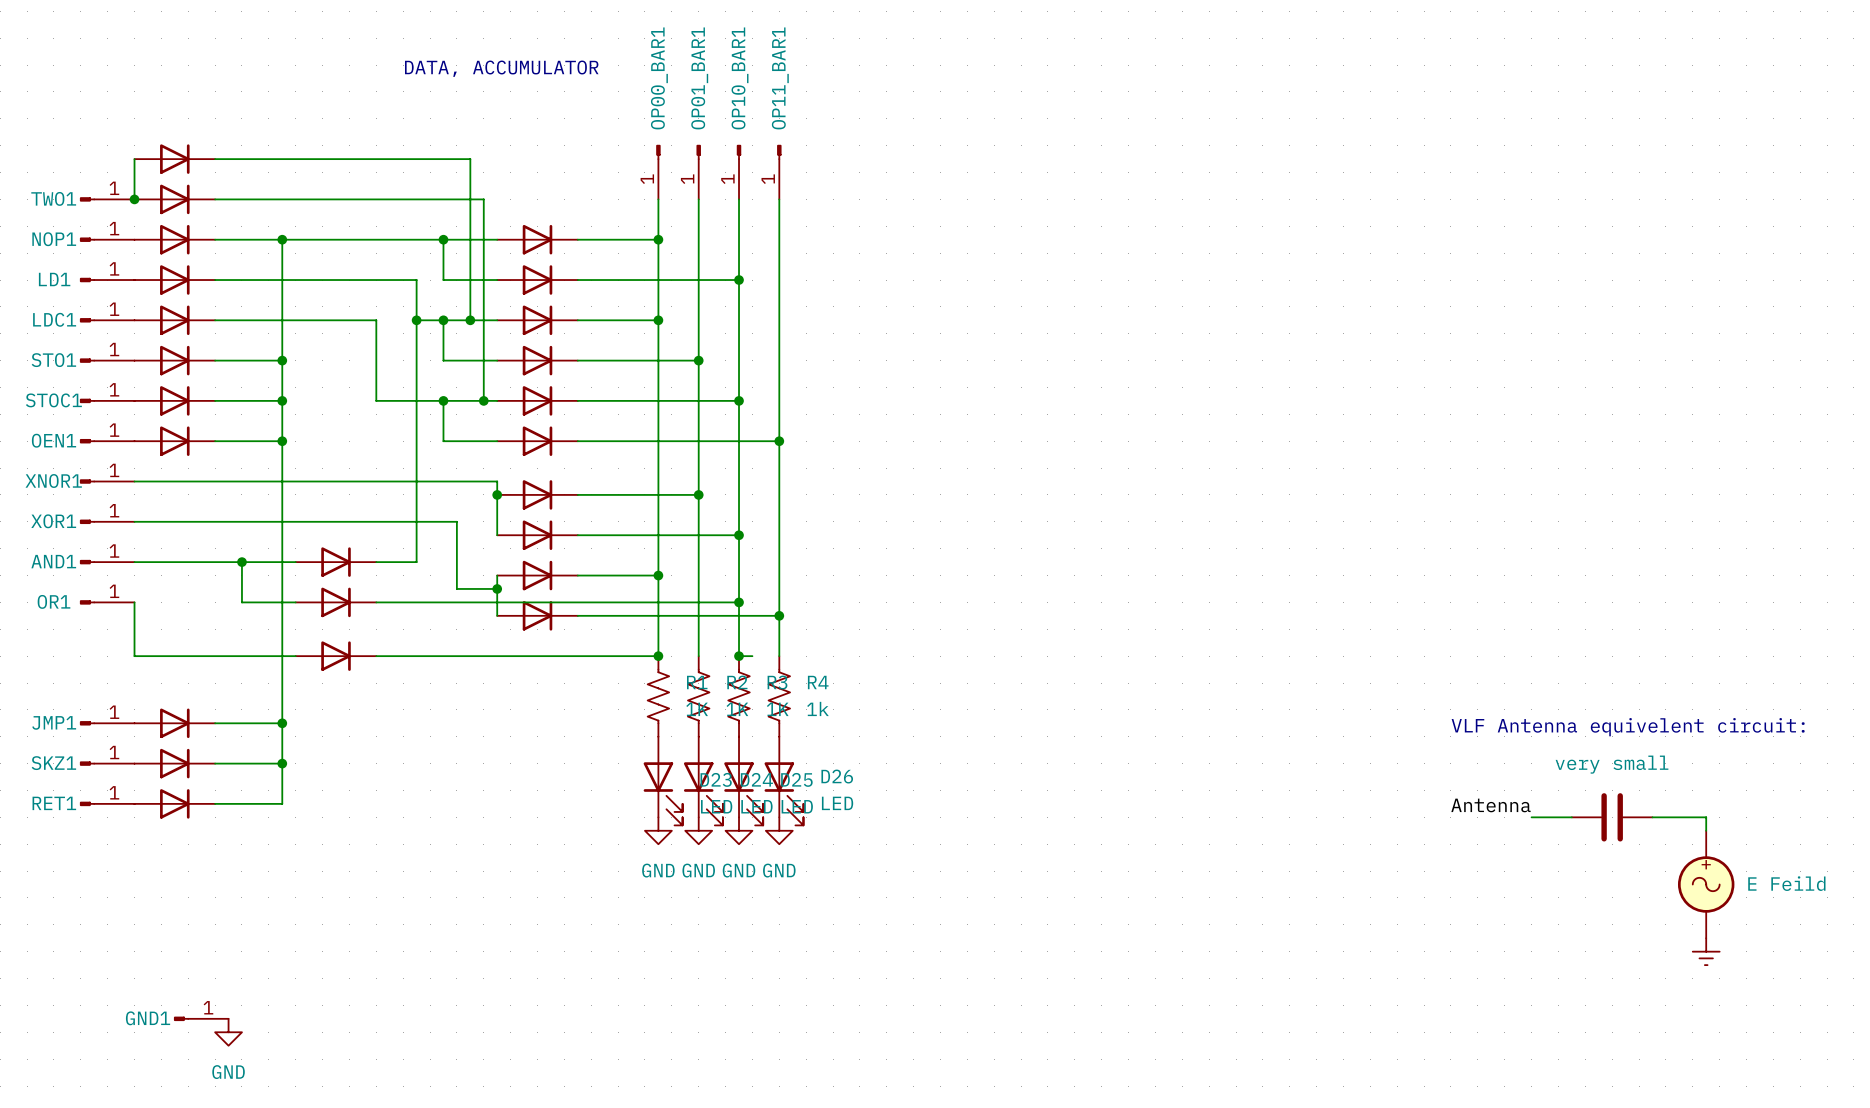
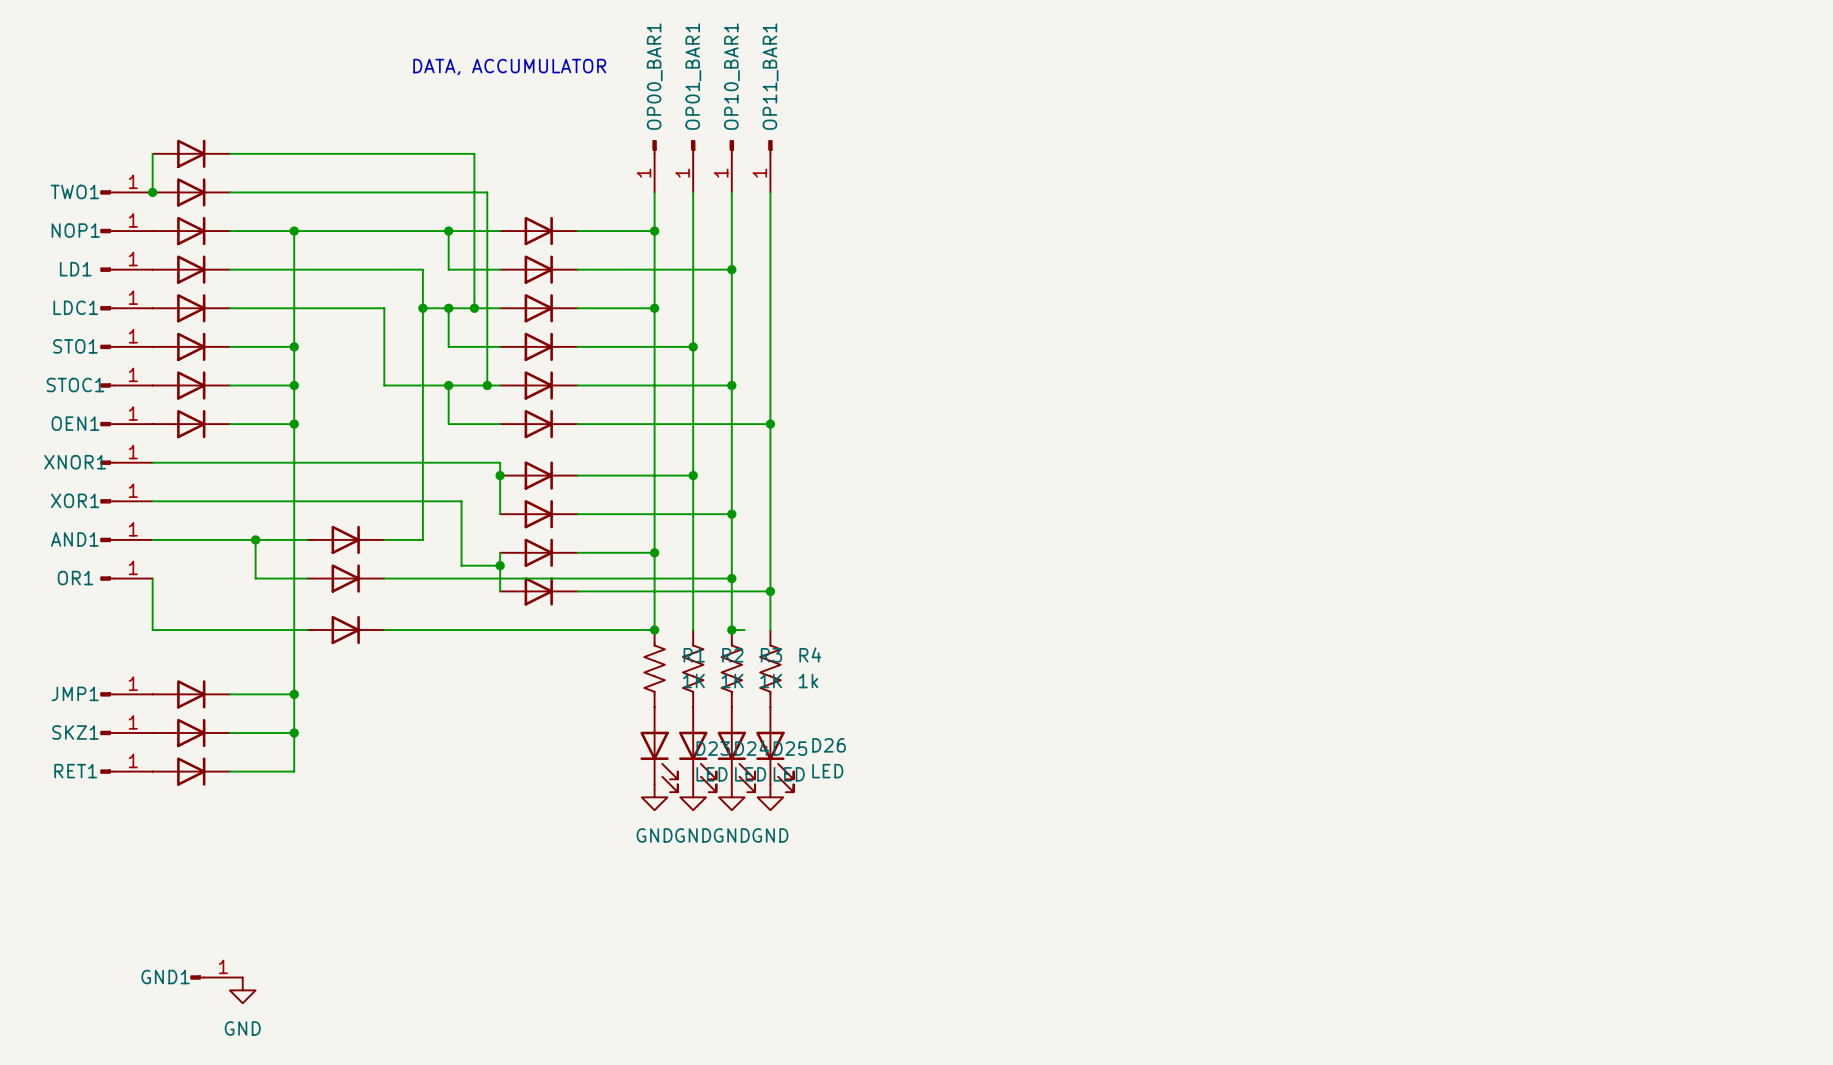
text: VLF Antenna equivelent circuit: (1628, 727) -> none
label: Antenna (1490, 805) -> none
wire: (1531, 817) (1571, 817) -> none
part: very small (1612, 817) -> none
wire: (1652, 817) (1706, 817) (1706, 830) -> none
part: E Feild (1706, 884) -> none
power symbol: (1706, 951) -> none

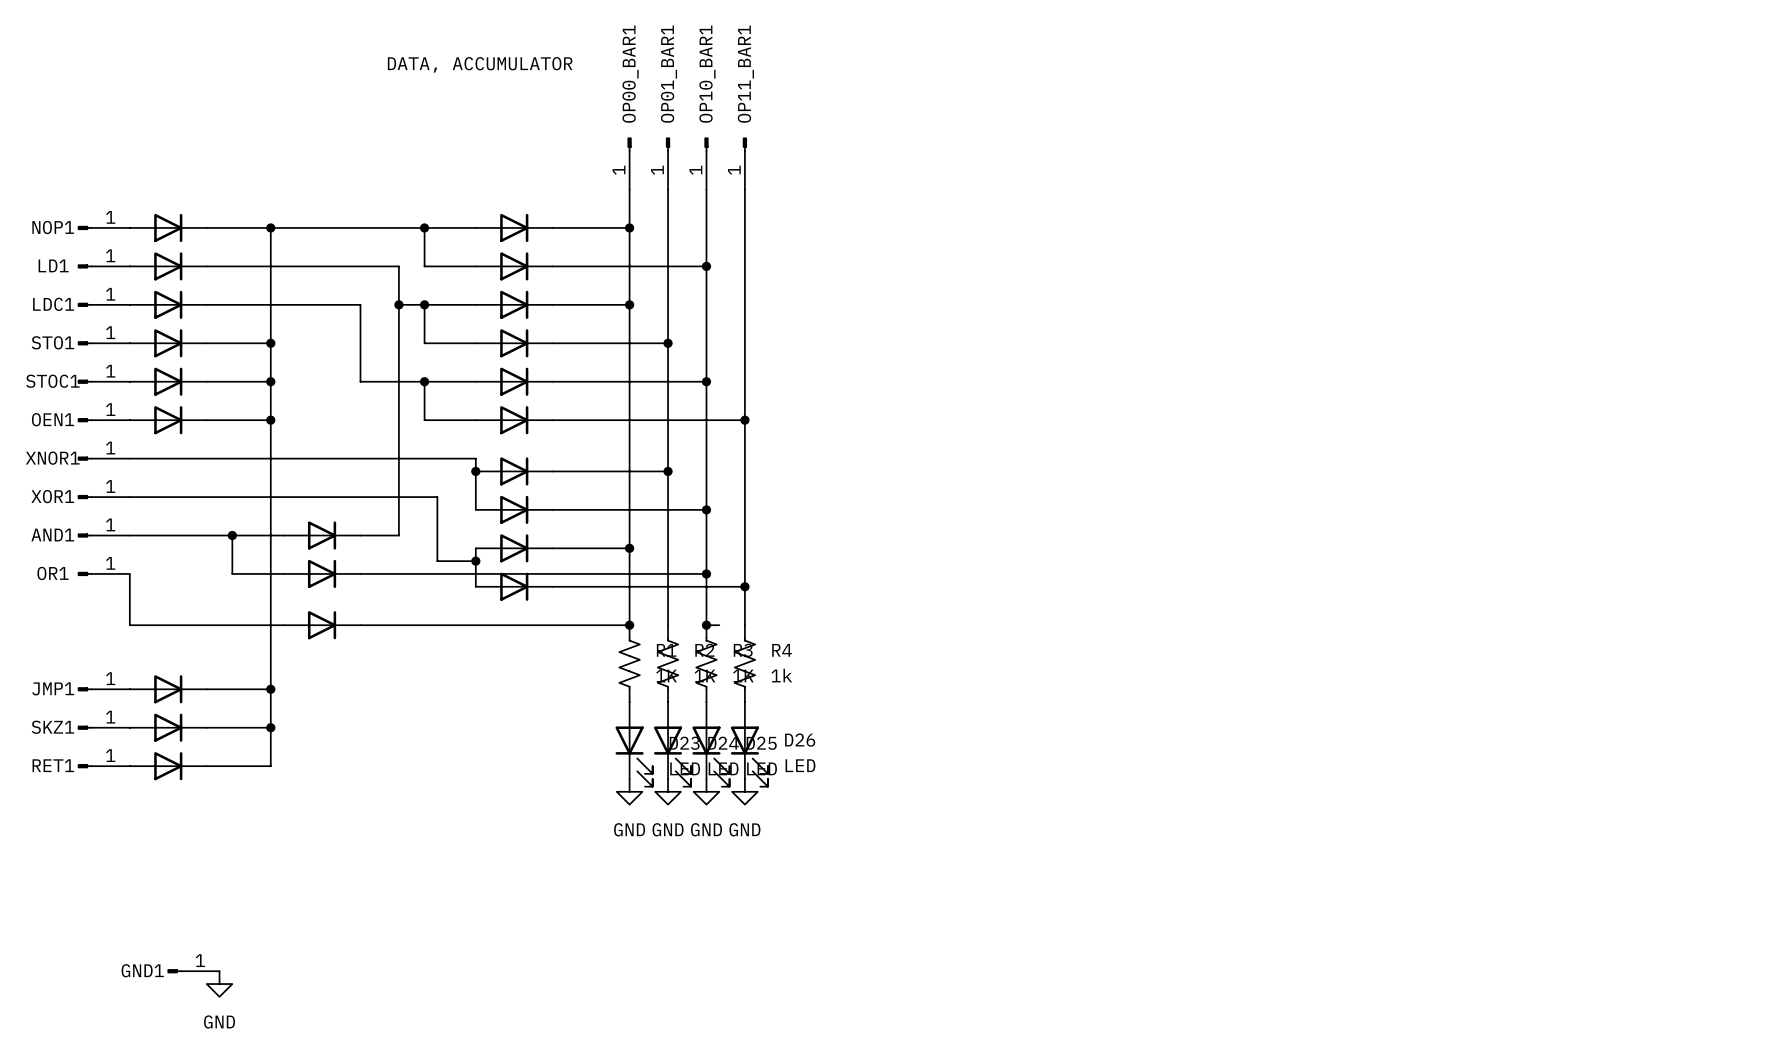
wire: (152, 153) (152, 192) -> none
part: (191, 153) -> none
wire: (229, 153) (474, 153) (474, 308) -> none
TWO1: (126, 192) -> none
junction: (152, 192) -> none
part: (191, 192) -> none
wire: (229, 192) (487, 192) (487, 385) -> none
junction: (474, 308) -> none
junction: (487, 385) -> none

